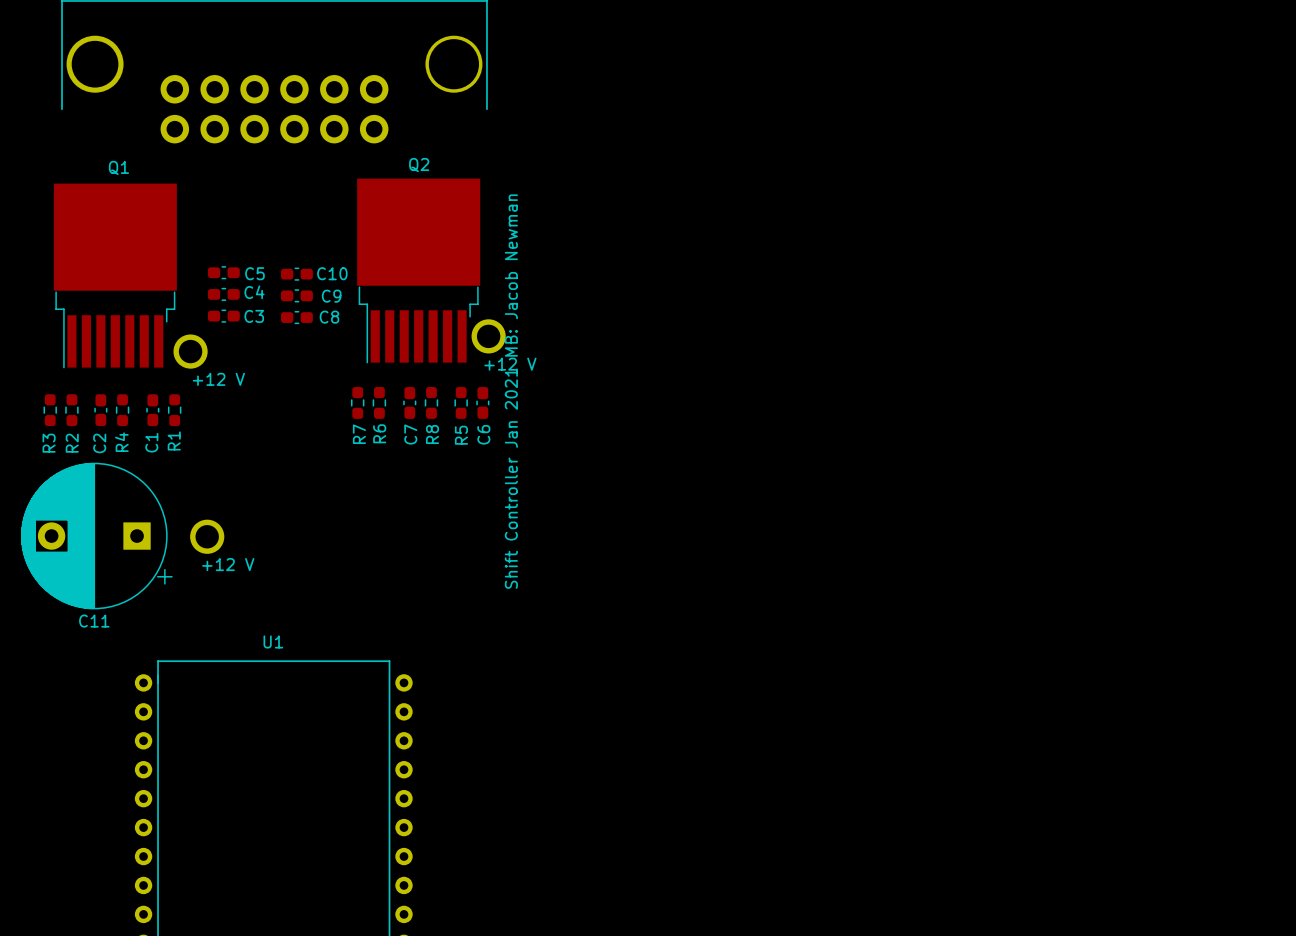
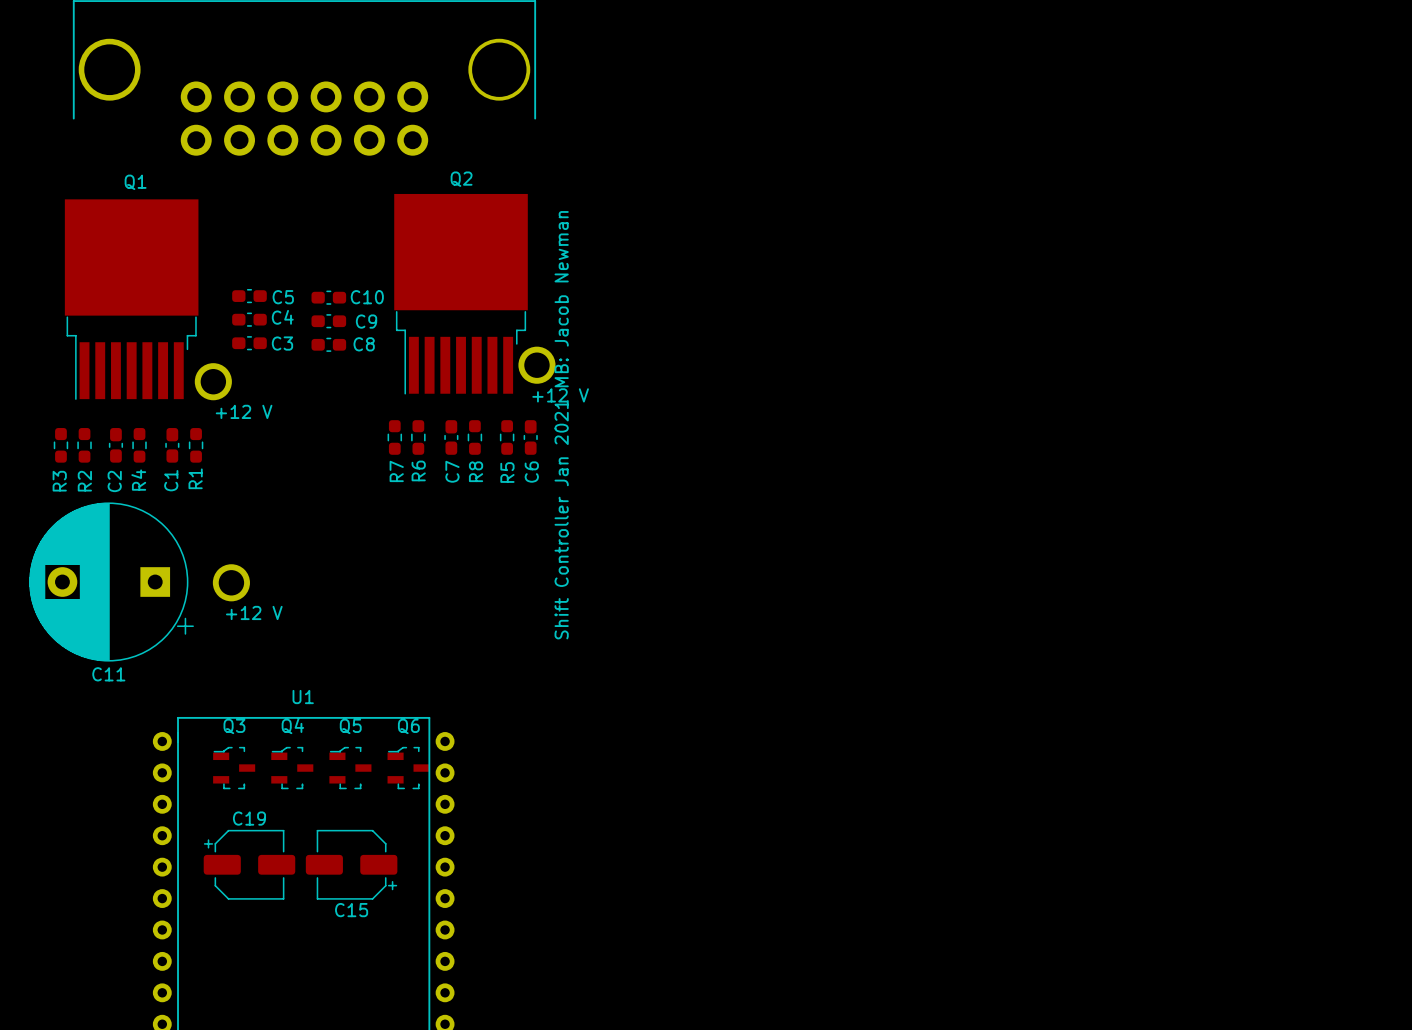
Q3: none -> (234, 768)
Q4: none -> (292, 768)
Q5: none -> (350, 768)
Q6: none -> (408, 768)
C19: none -> (249, 864)
C15: none -> (351, 864)

